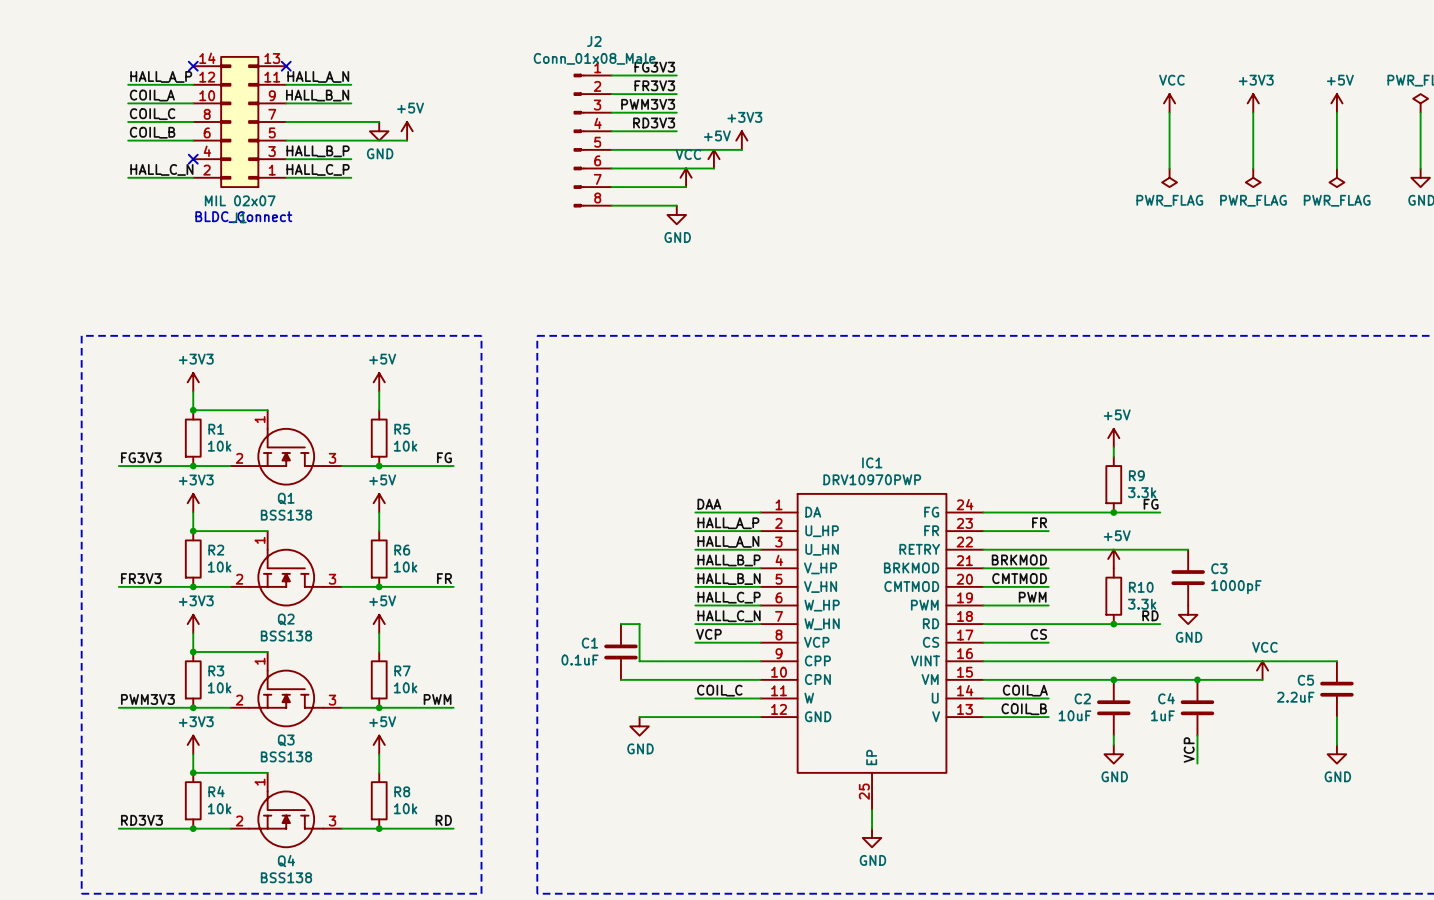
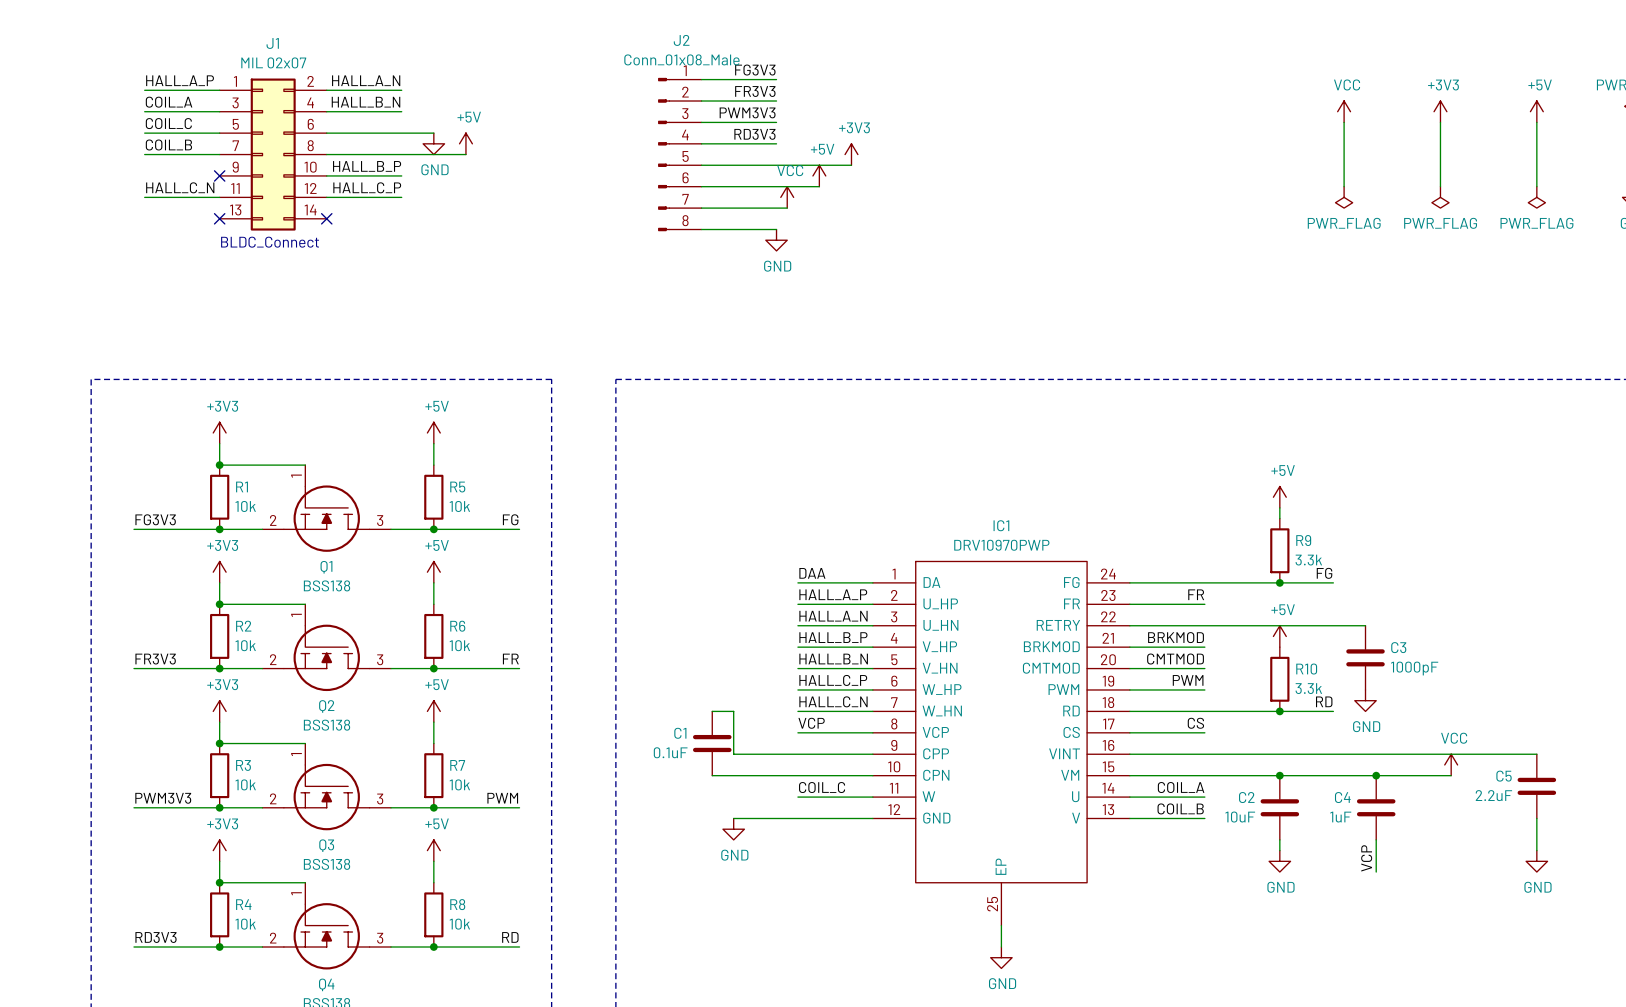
no-connect mark: (193, 66) -> none
no-connect mark: (286, 66) -> none
J1 rotation: 0° (239, 121) -> 180° (273, 154)
no-connect mark: none -> (219, 218)
no-connect mark: none -> (326, 218)

